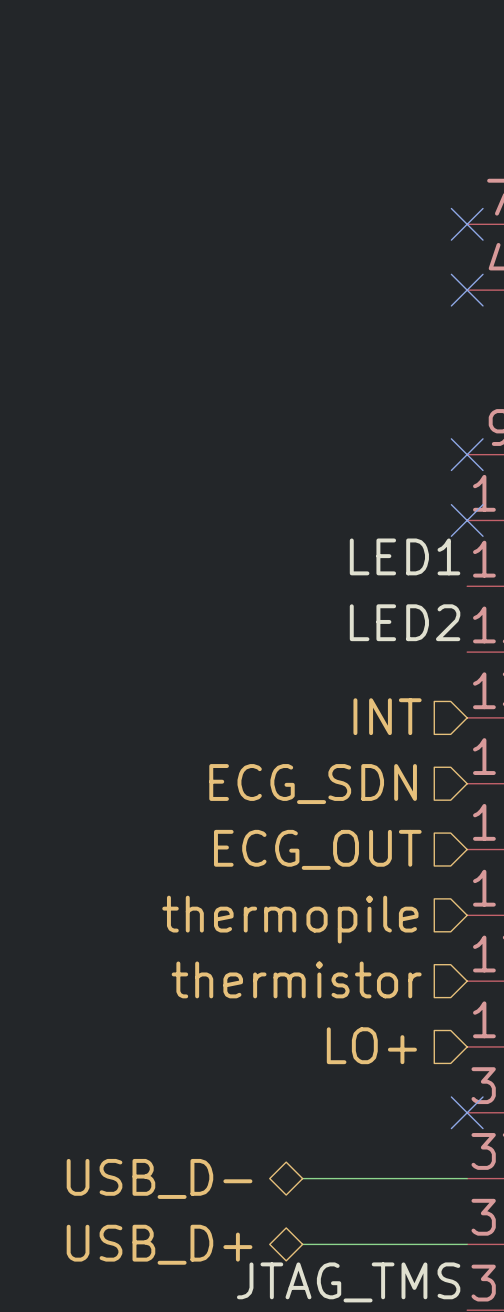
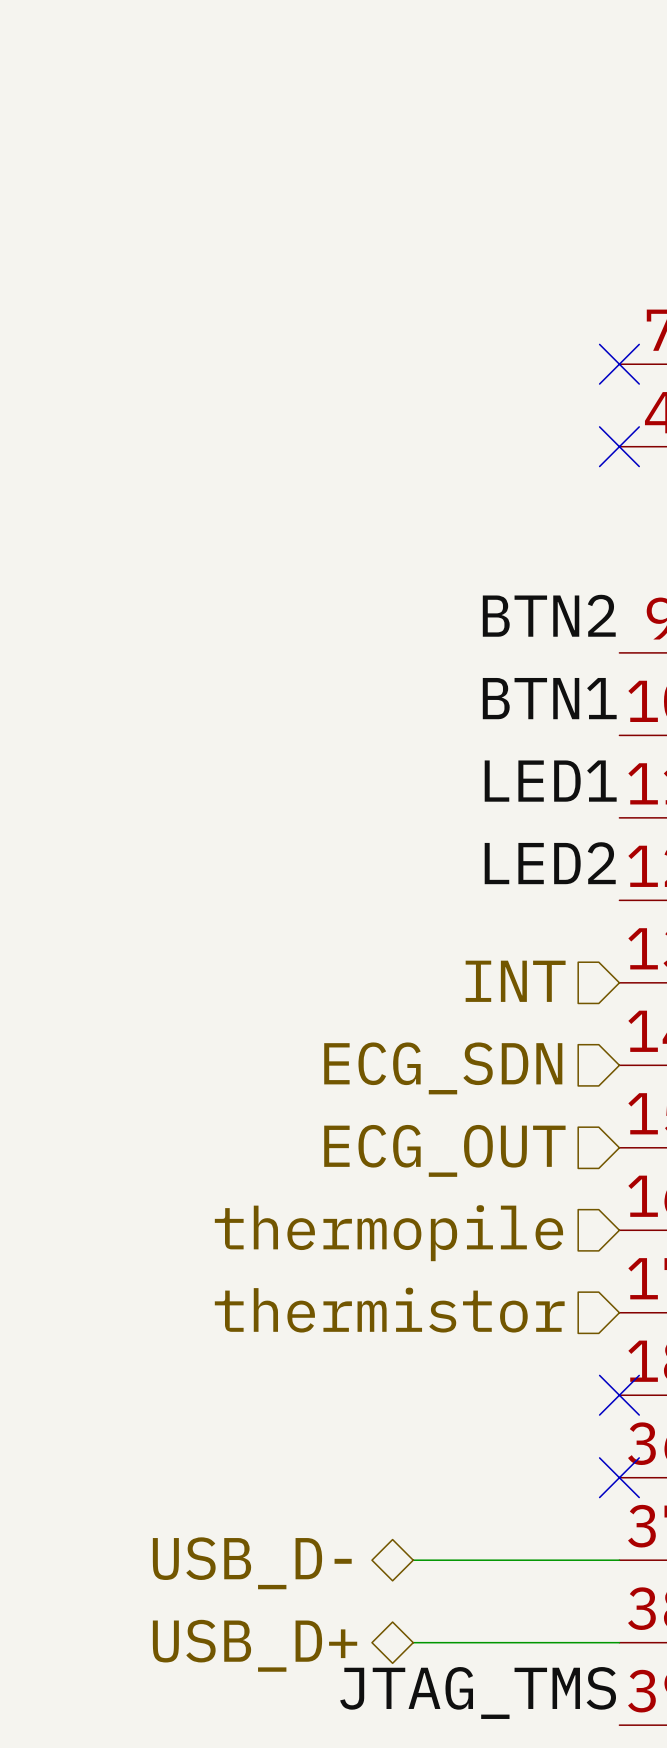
label: none -> BTN2 (549, 615)
no-connect mark: (467, 454) -> none
label: none -> BTN1 (549, 698)
no-connect mark: (467, 520) -> none
hierarchical label: LO+ (371, 1045) -> none
no-connect mark: none -> (619, 1395)

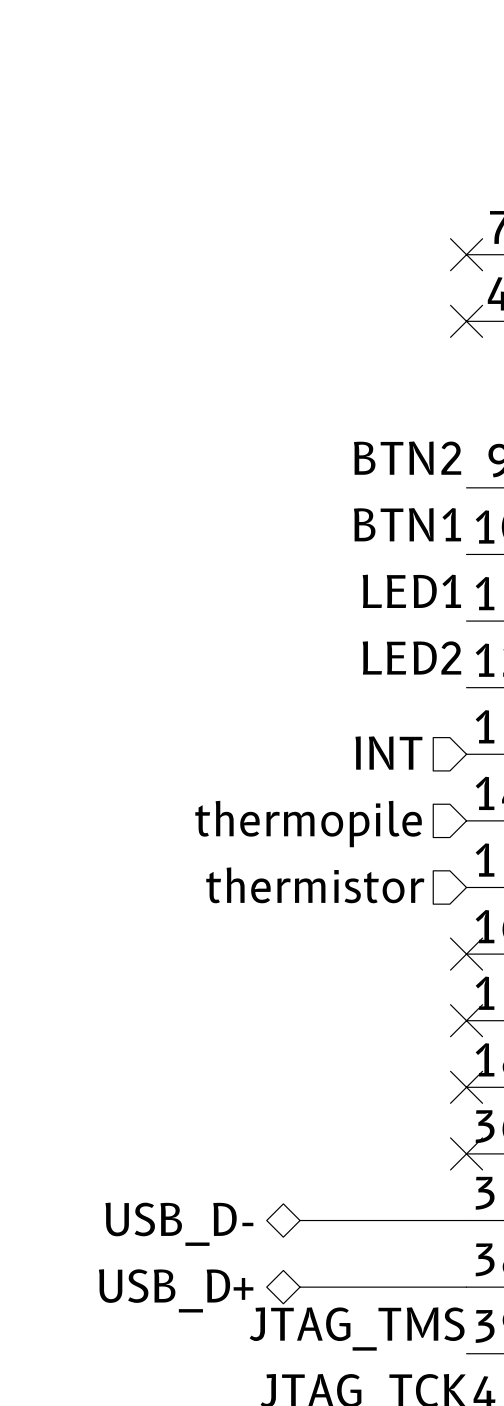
hierarchical label: ECG_SDN (443, 1068) -> thermopile (308, 824)
hierarchical label: ECG_OUT (444, 1150) -> thermistor (315, 885)
no-connect mark: none -> (466, 954)
hierarchical label: thermopile (388, 1233) -> none
hierarchical label: thermistor (389, 1310) -> none
no-connect mark: none -> (466, 1020)

